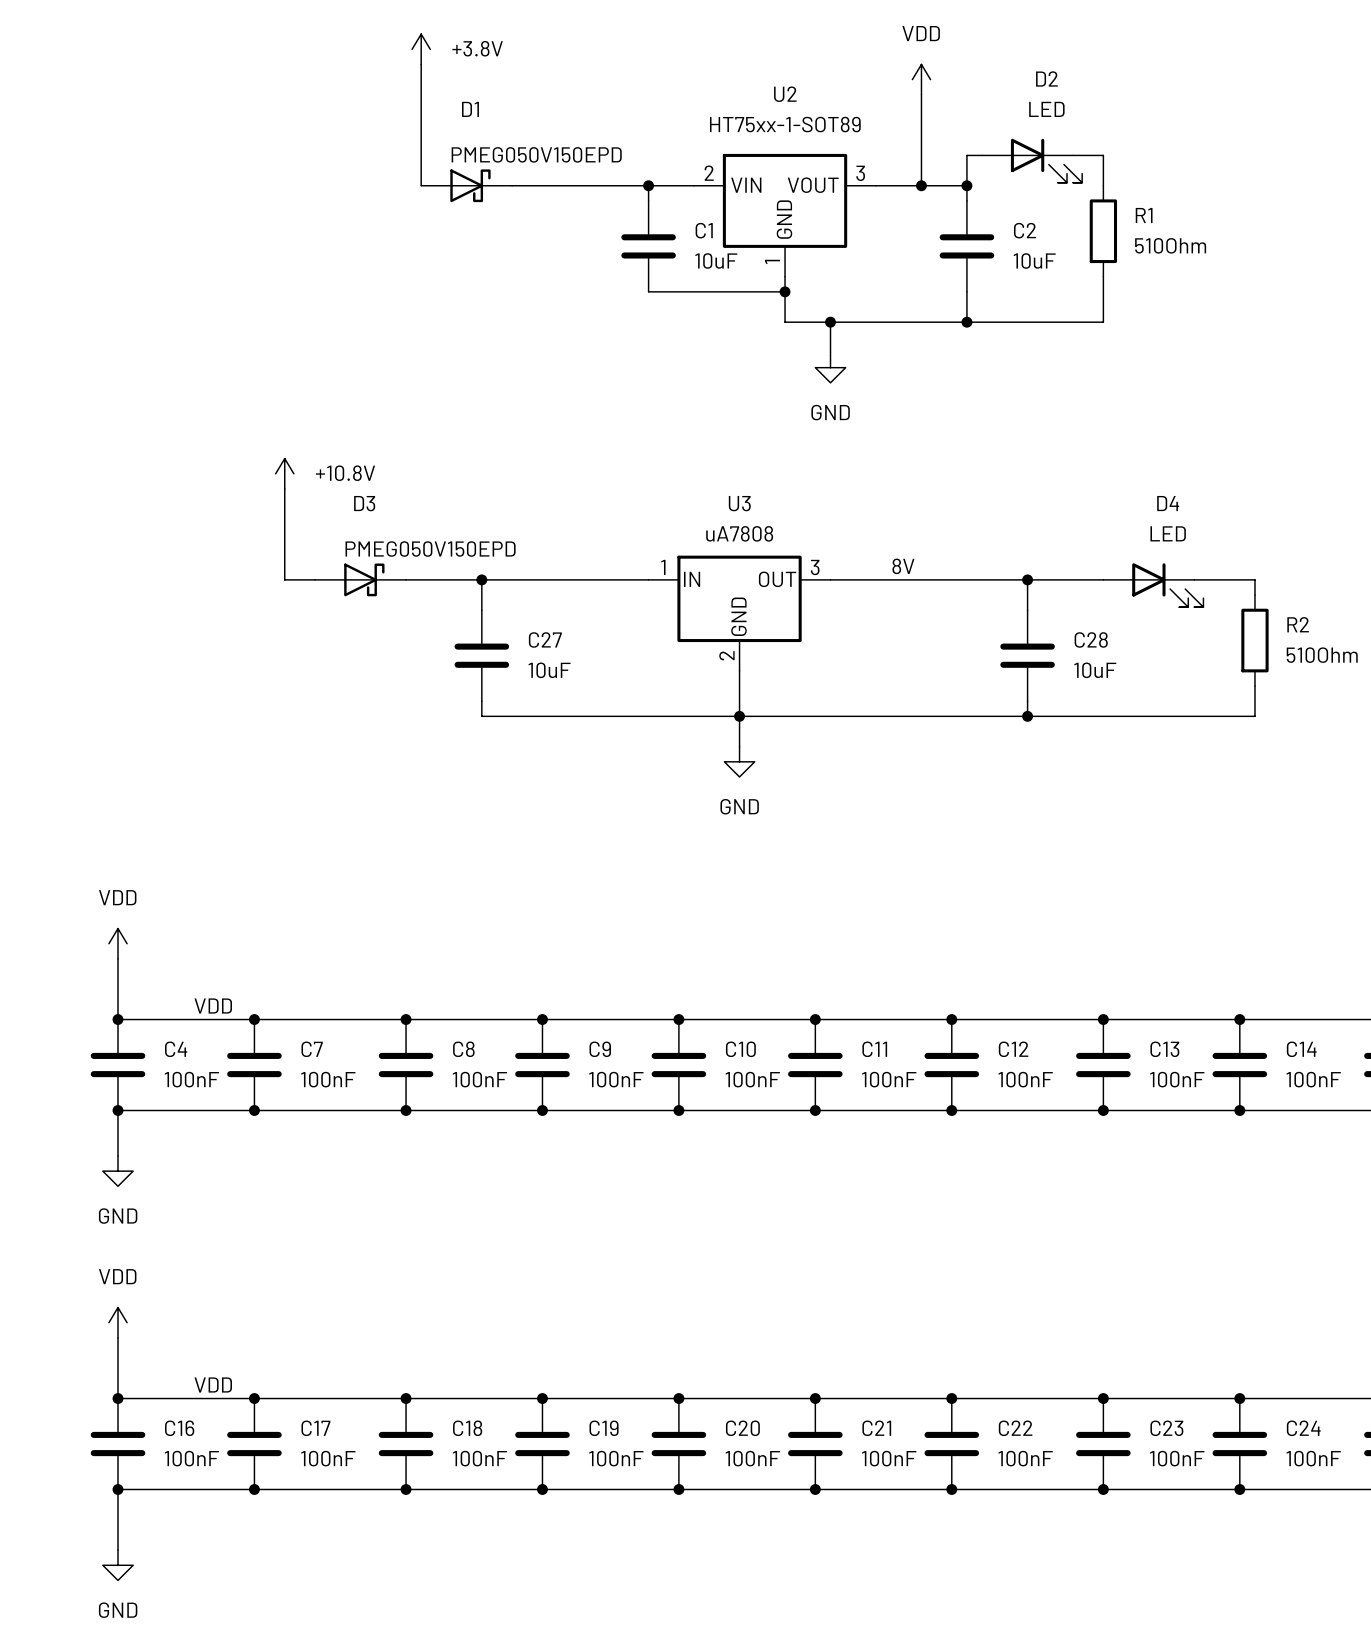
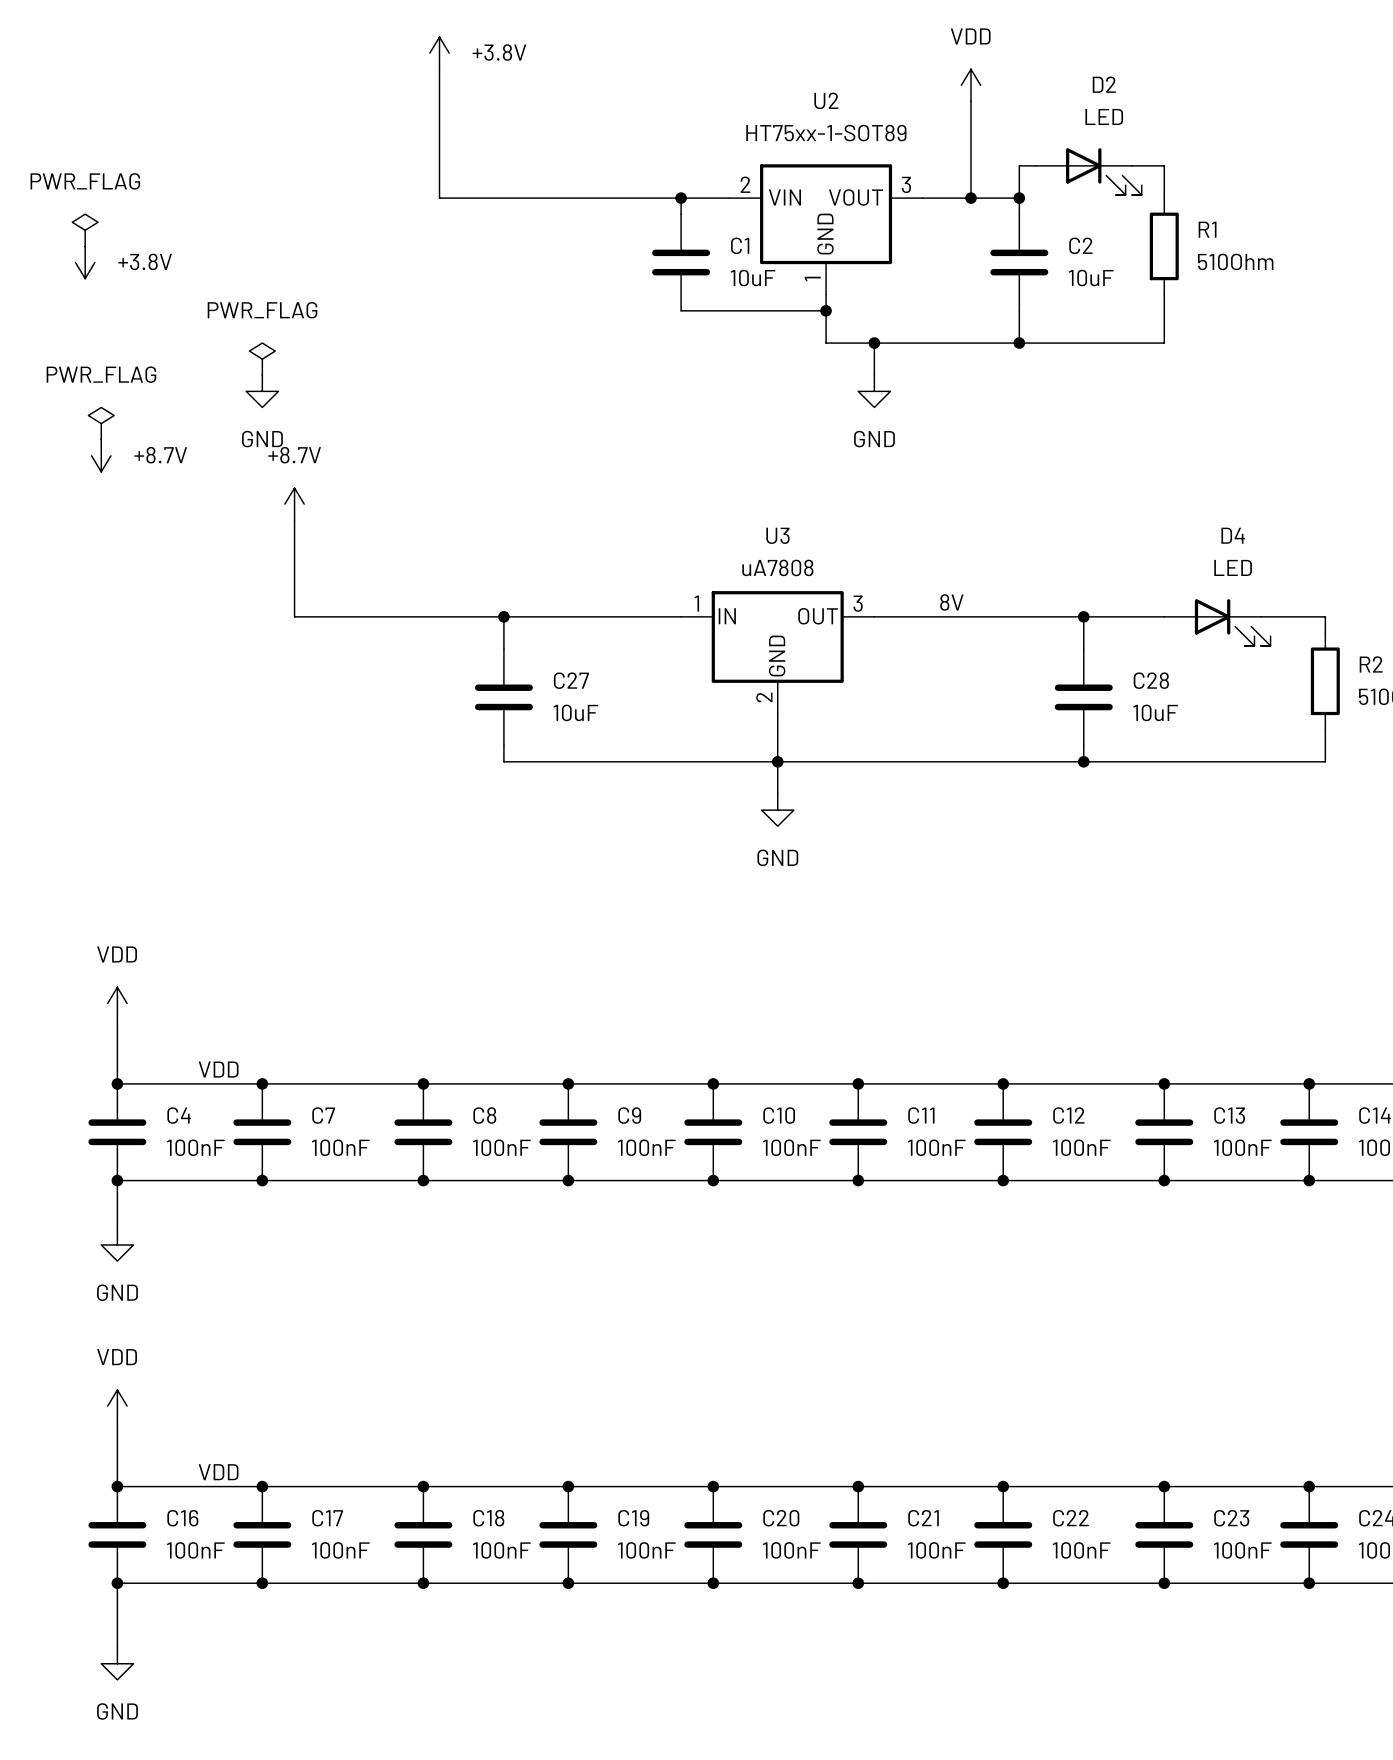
D1: PMEG050V150EPD (466, 185) -> none
power symbol: none -> PWR_FLAG (85, 230)
power symbol: none -> +3.8V (85, 262)
power symbol: none -> PWR_FLAG (262, 359)
power symbol: none -> GND (262, 391)
power symbol: none -> PWR_FLAG (101, 423)
power symbol: none -> +8.7V (101, 455)
power symbol: +10.8V (284, 473) -> +8.7V (294, 504)
D3: PMEG050V150EPD (360, 579) -> none

